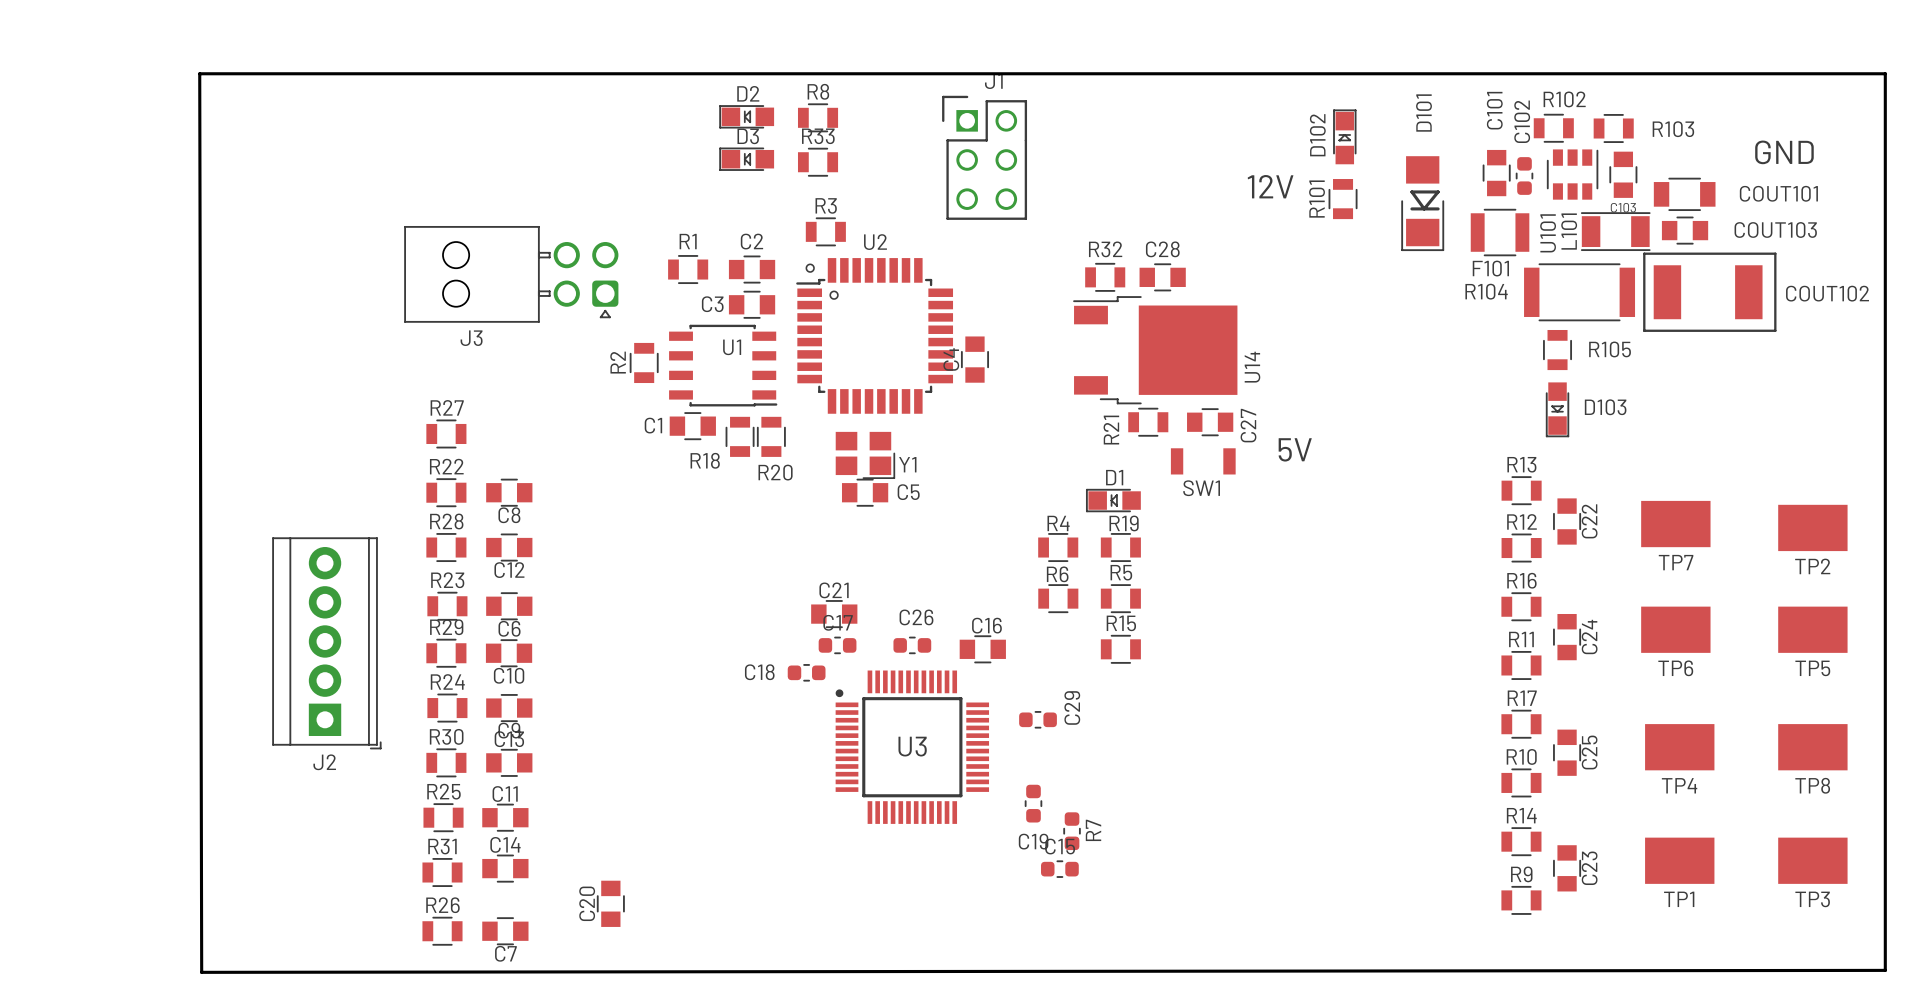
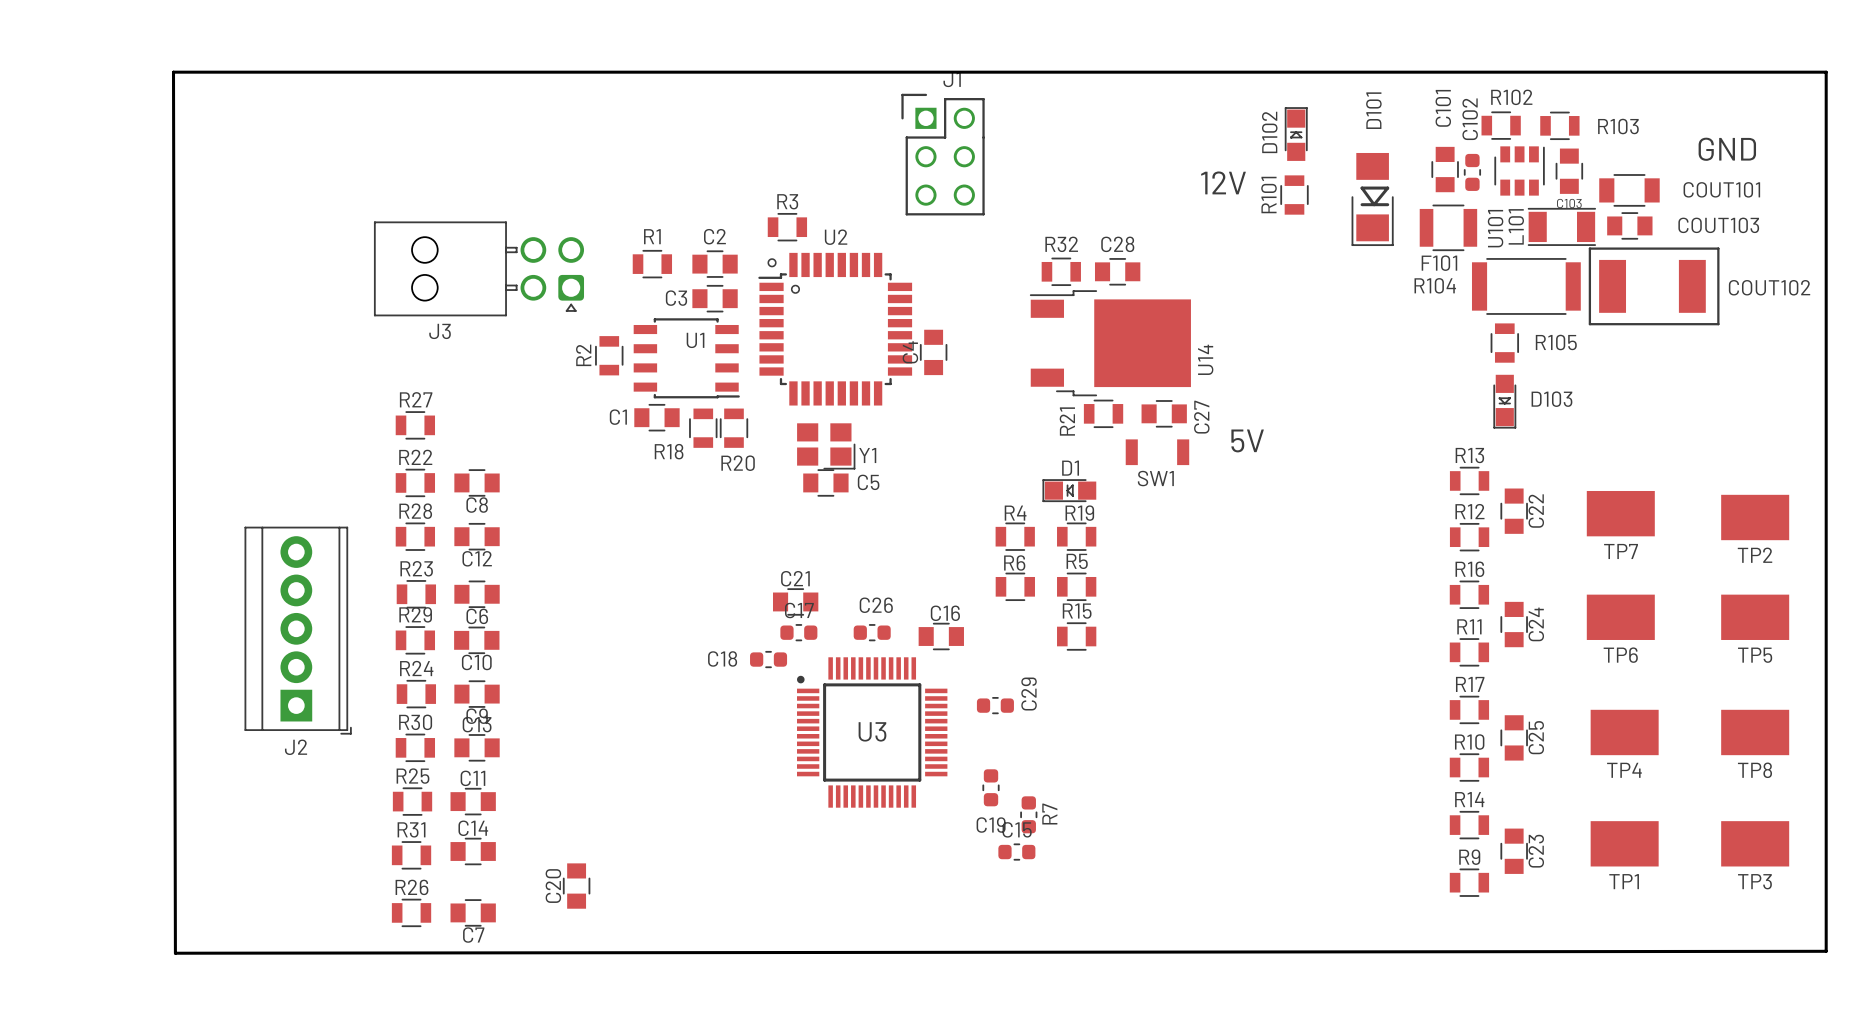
D2: (746, 116) -> none
R8: (818, 117) -> none
D3: (746, 159) -> none
R33: (818, 162) -> none

